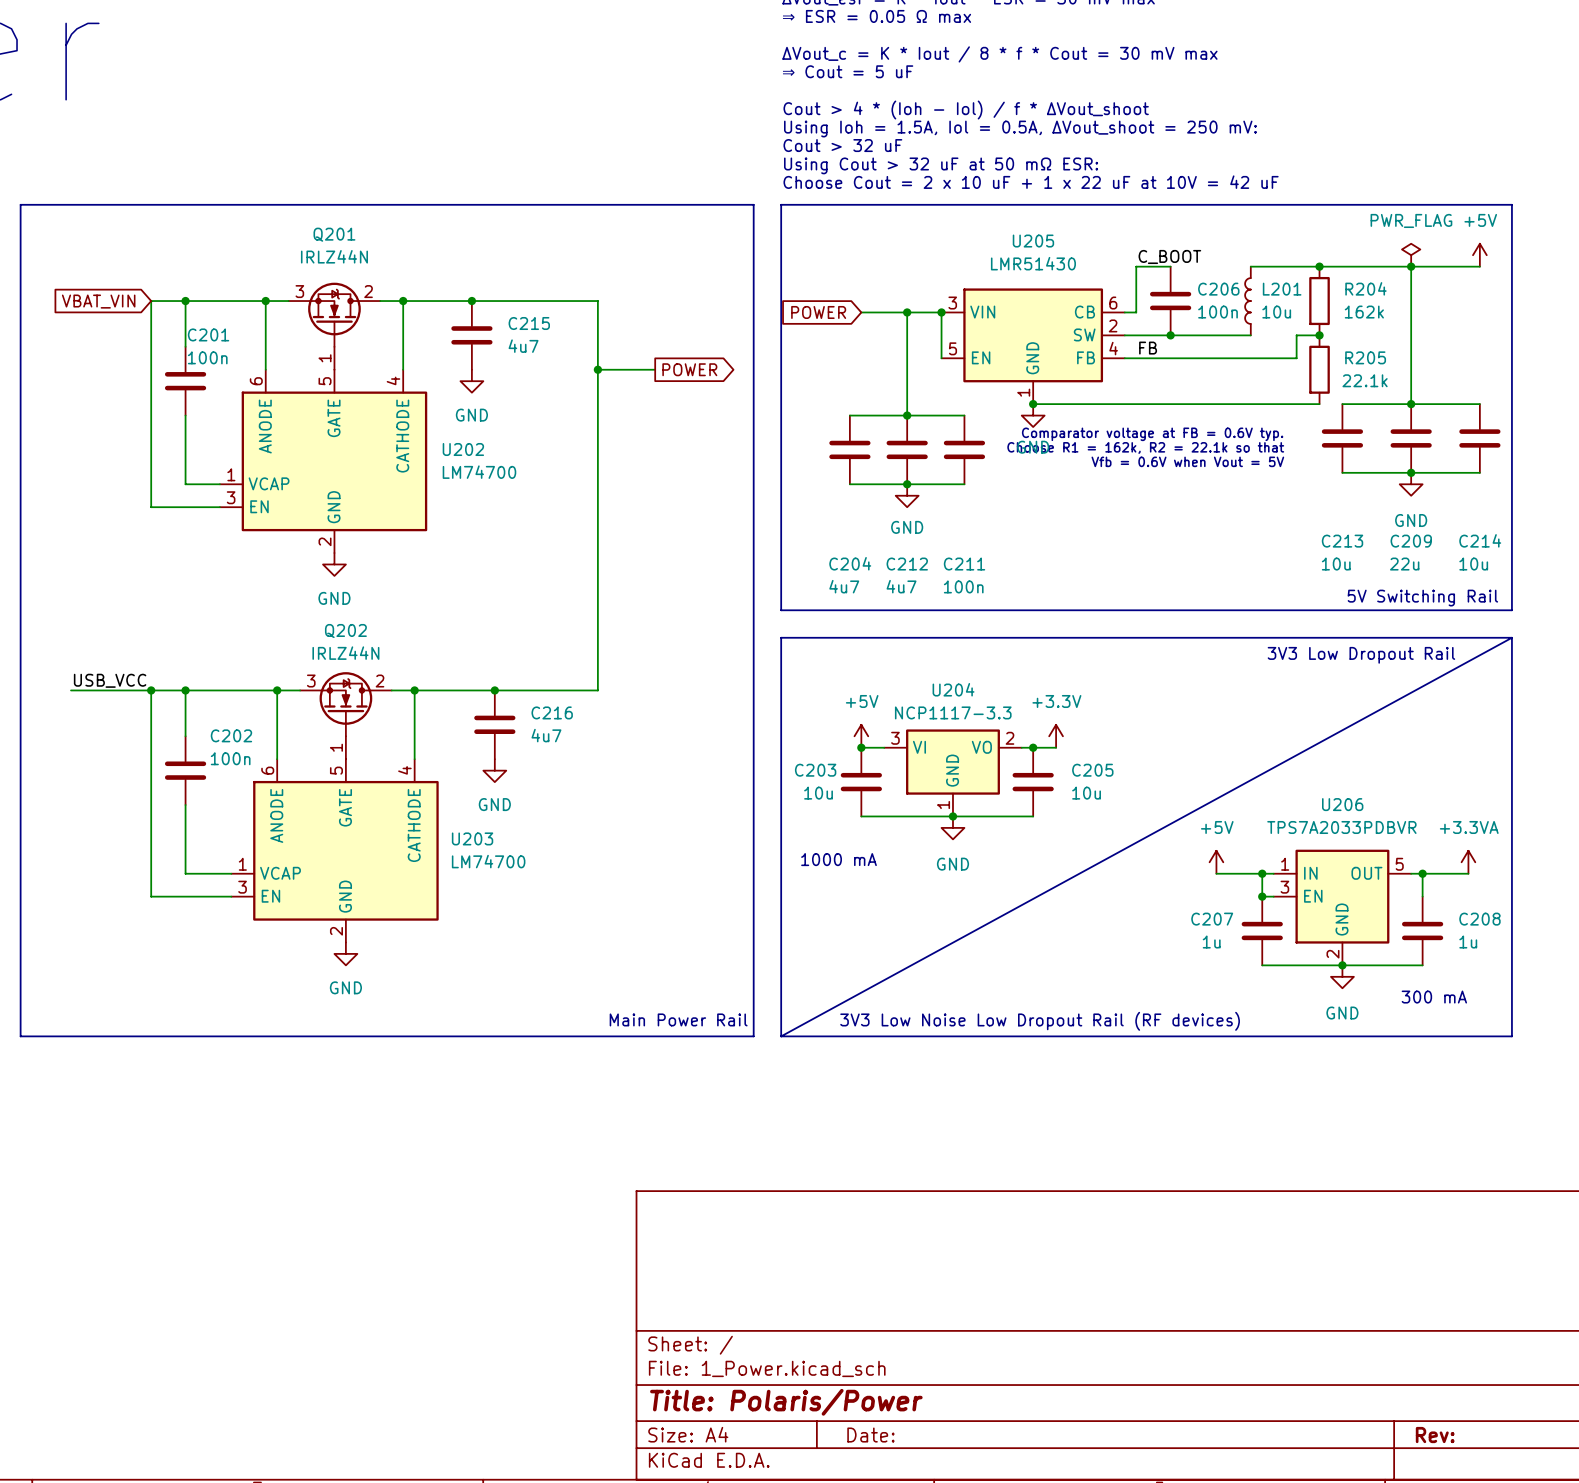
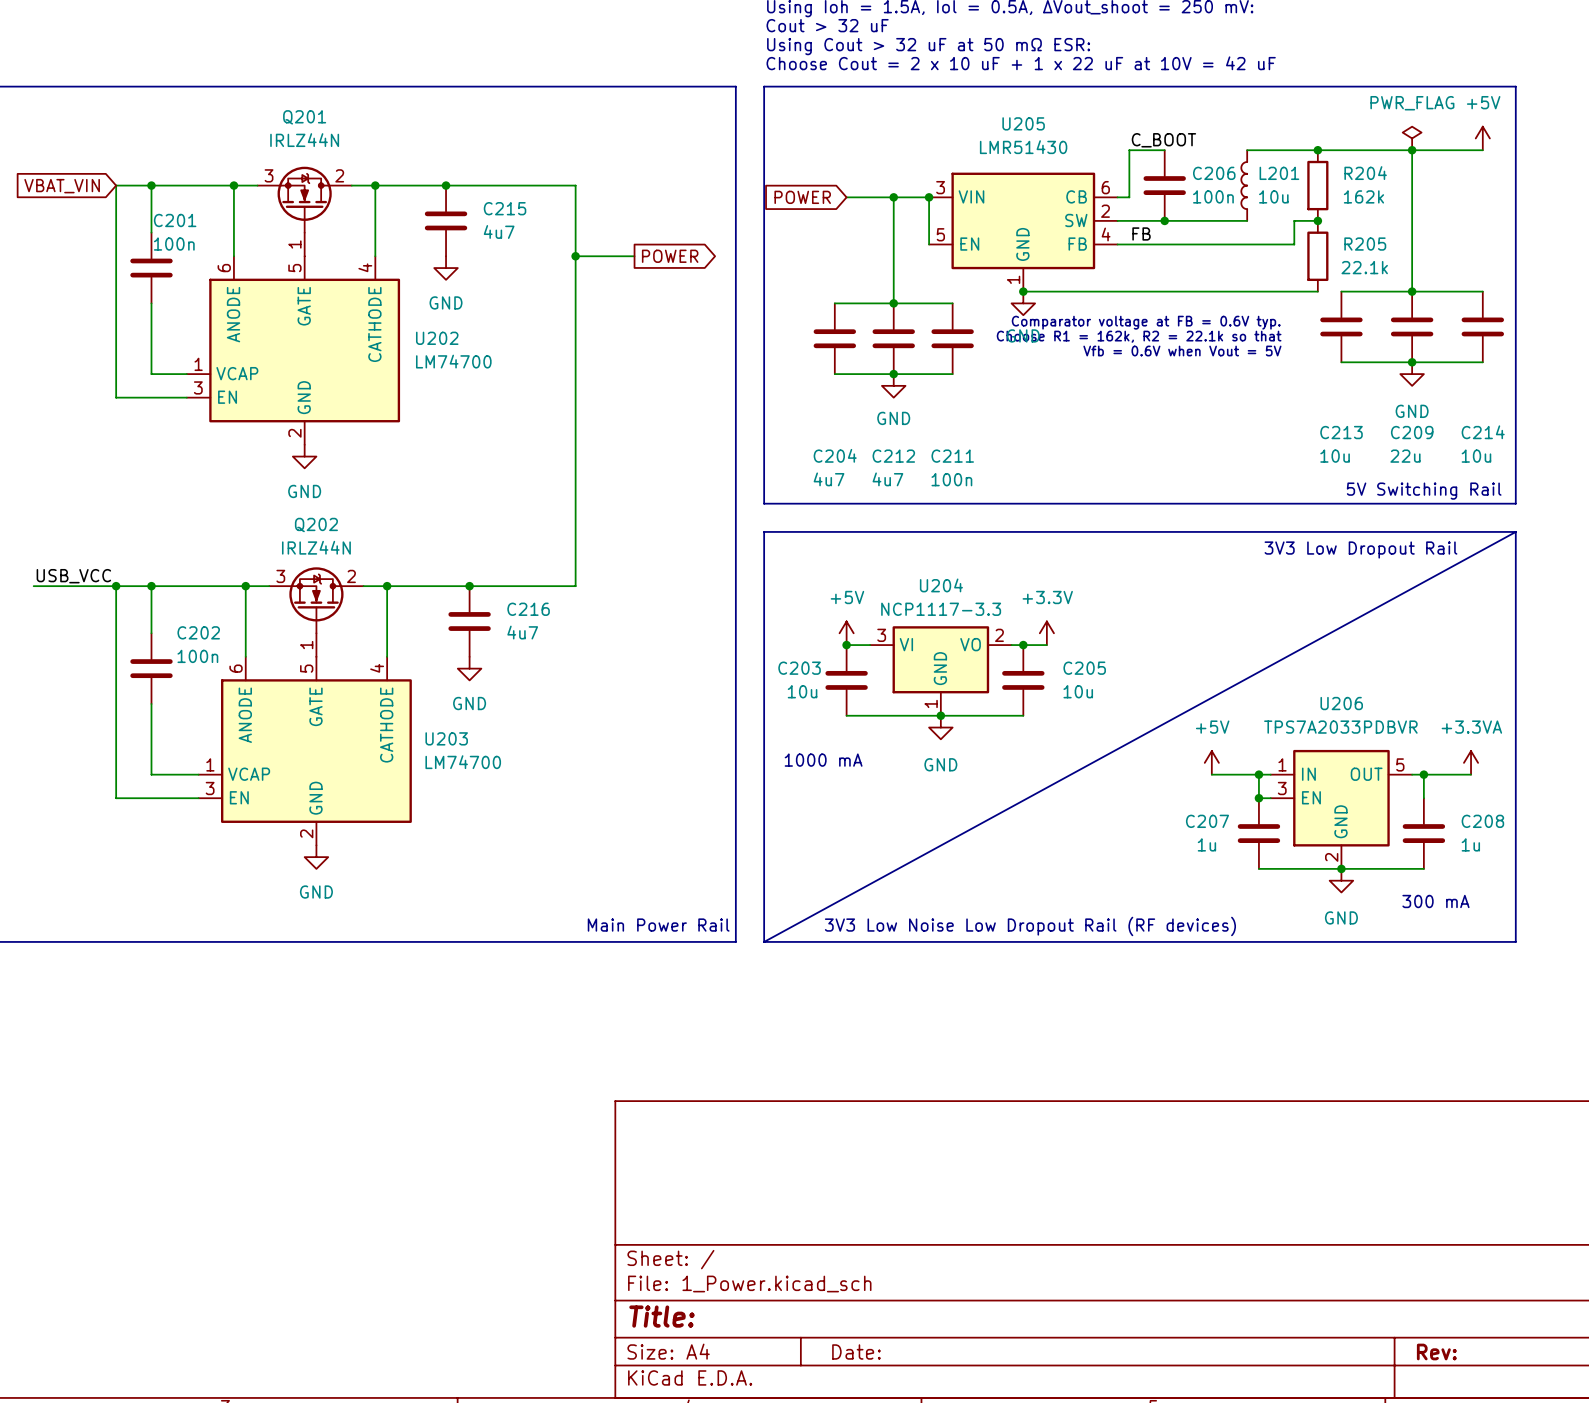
title block: Title: Polaris/Power (786, 1402) -> Title: (662, 1316)

